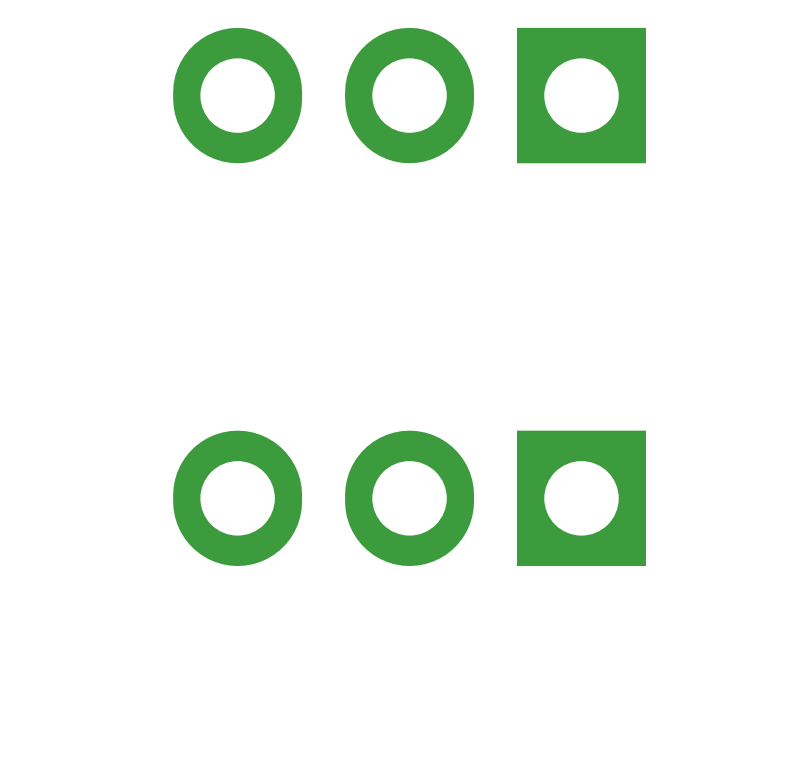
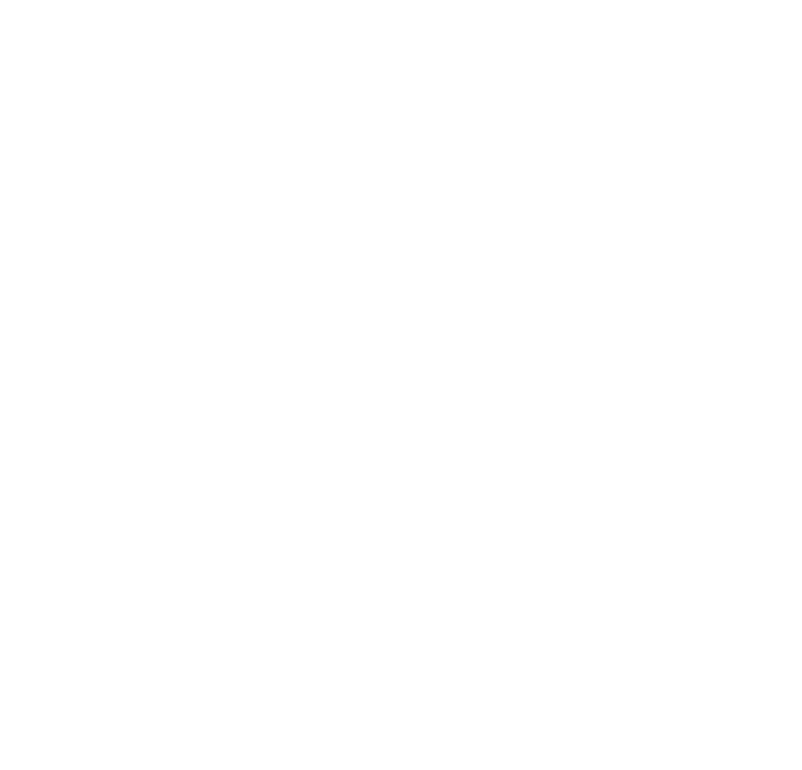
part: (409, 95) -> none
part: (409, 498) -> none

